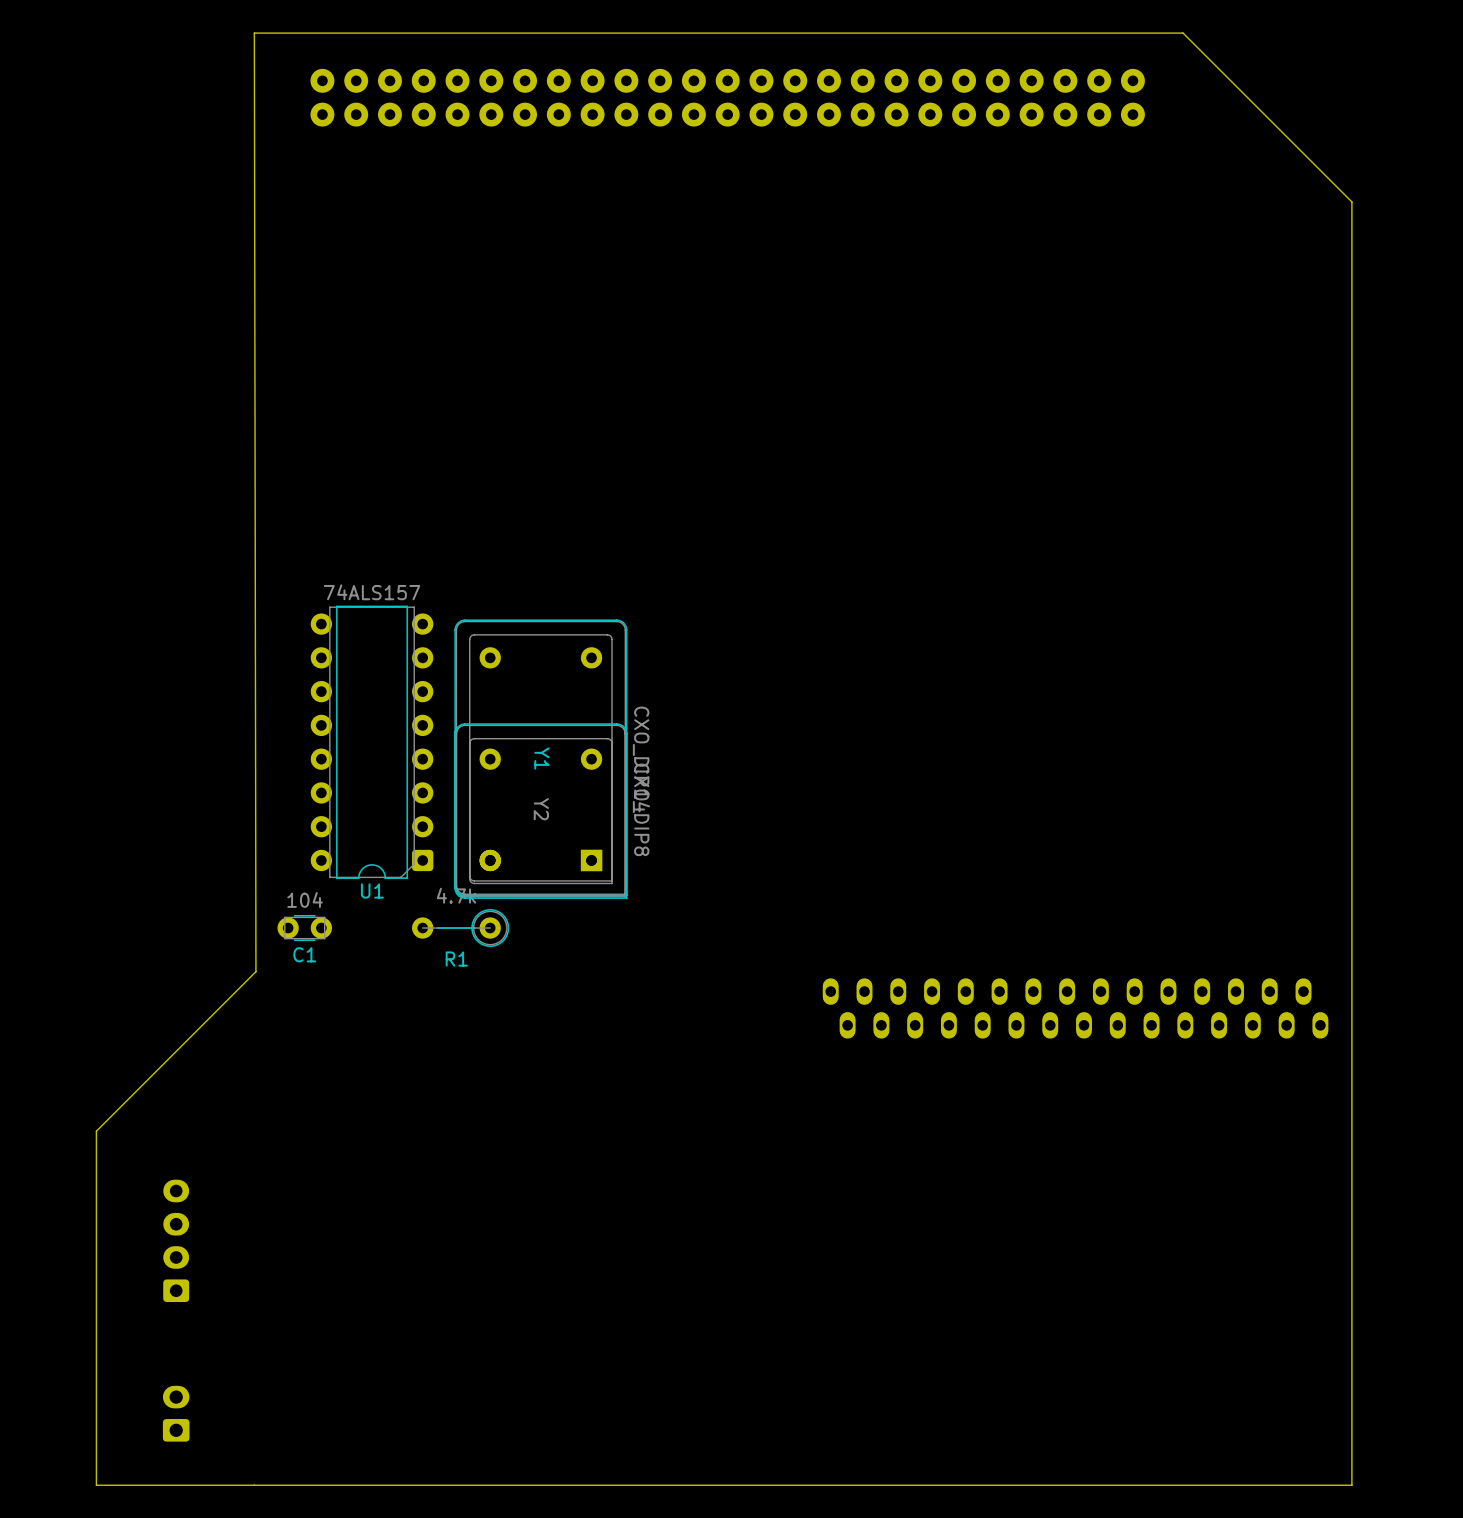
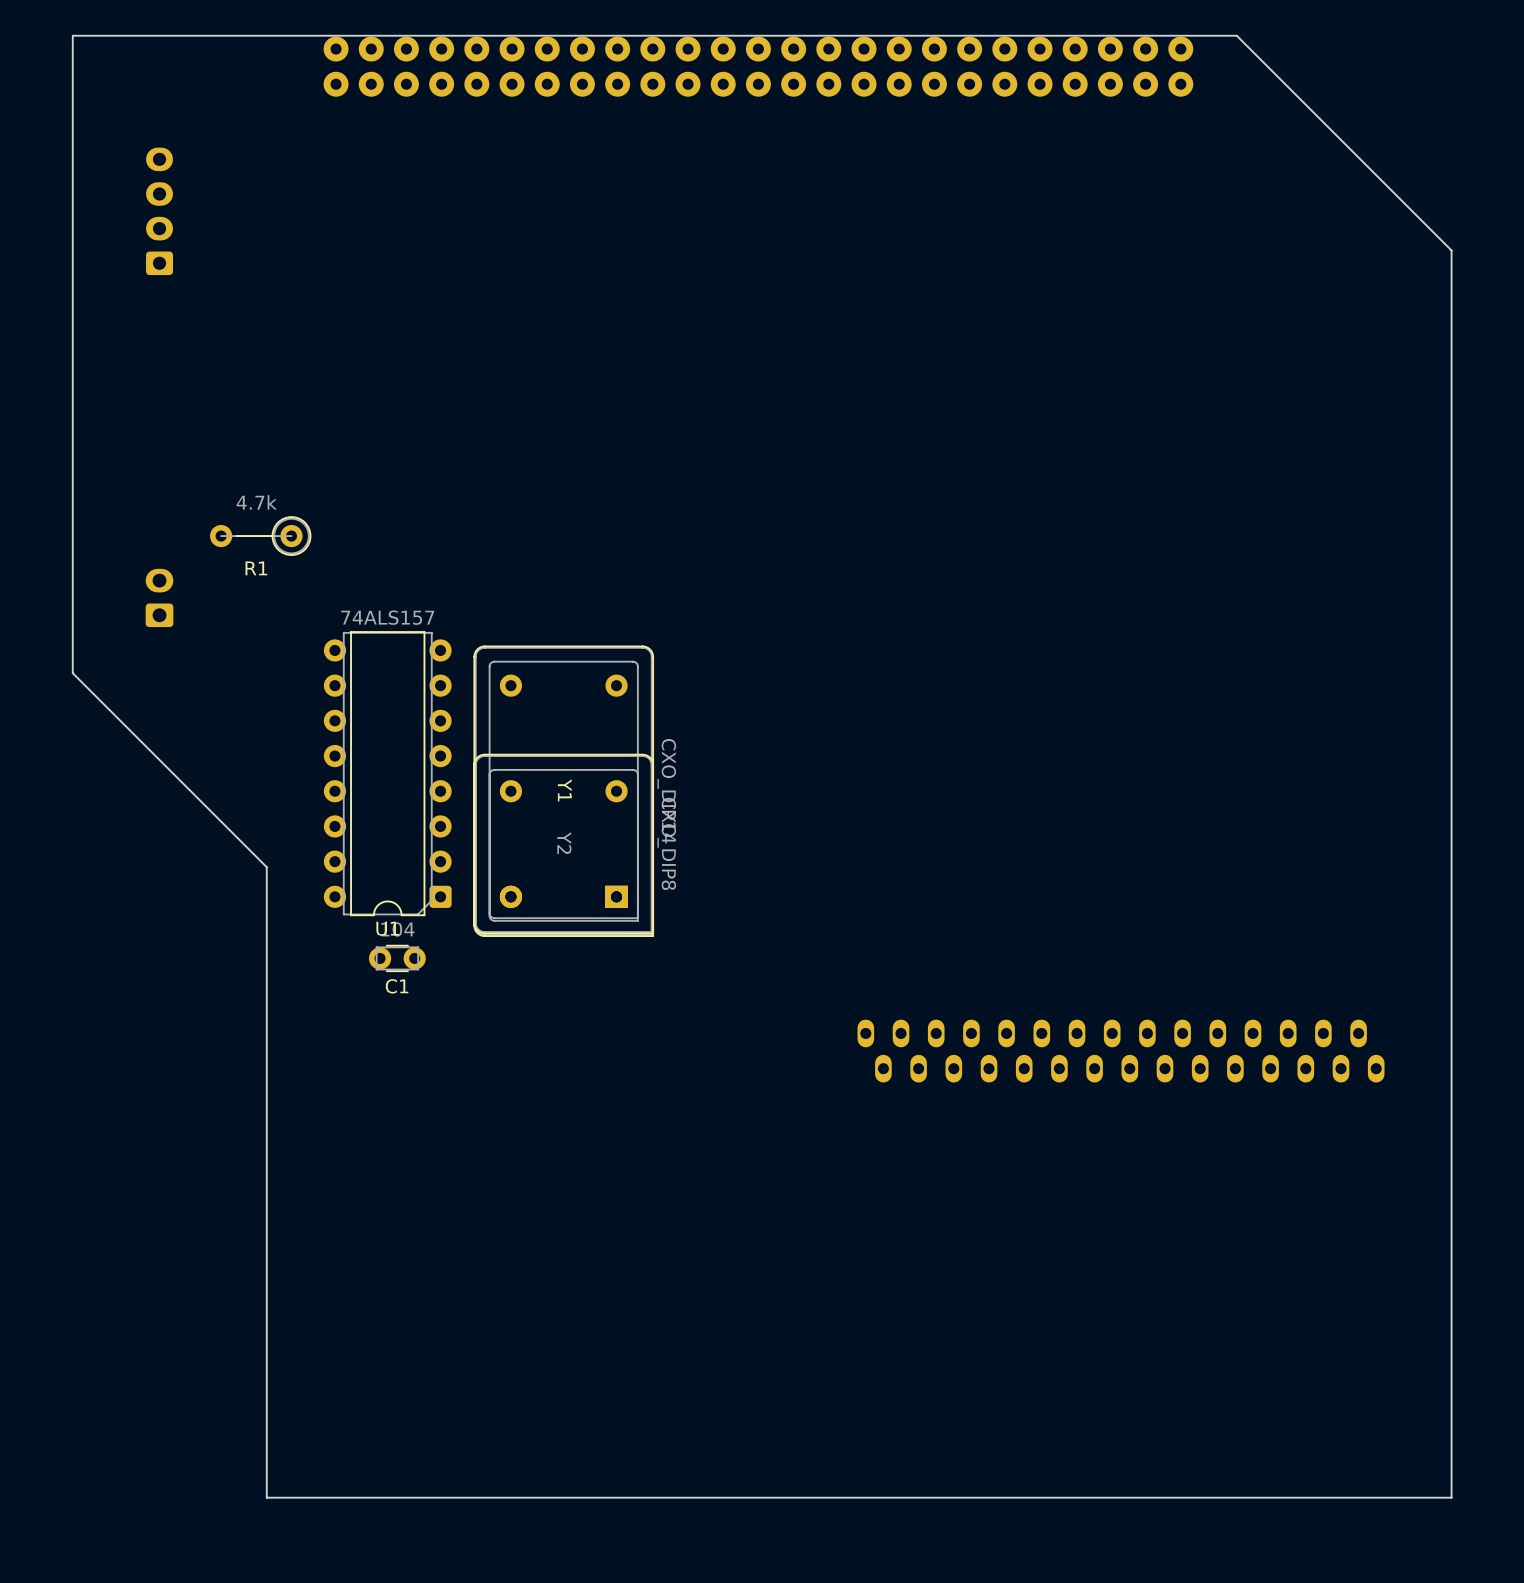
board edge: (1183, 33) (1351, 201) (1351, 1485) (96, 1485) (96, 1131) (255, 971) (254, 33) (1183, 33) -> (1236, 35) (1451, 250) (1451, 1497) (266, 1497) (266, 867) (72, 673) (72, 35) (1236, 35)
part position: (727, 97) -> (758, 66)
part: none -> (159, 211)
part: none -> (159, 597)
C1 position: (304, 928) -> (397, 958)
R1 position: (460, 928) -> (260, 536)
part: (176, 1240) -> none
part: (176, 1413) -> none

